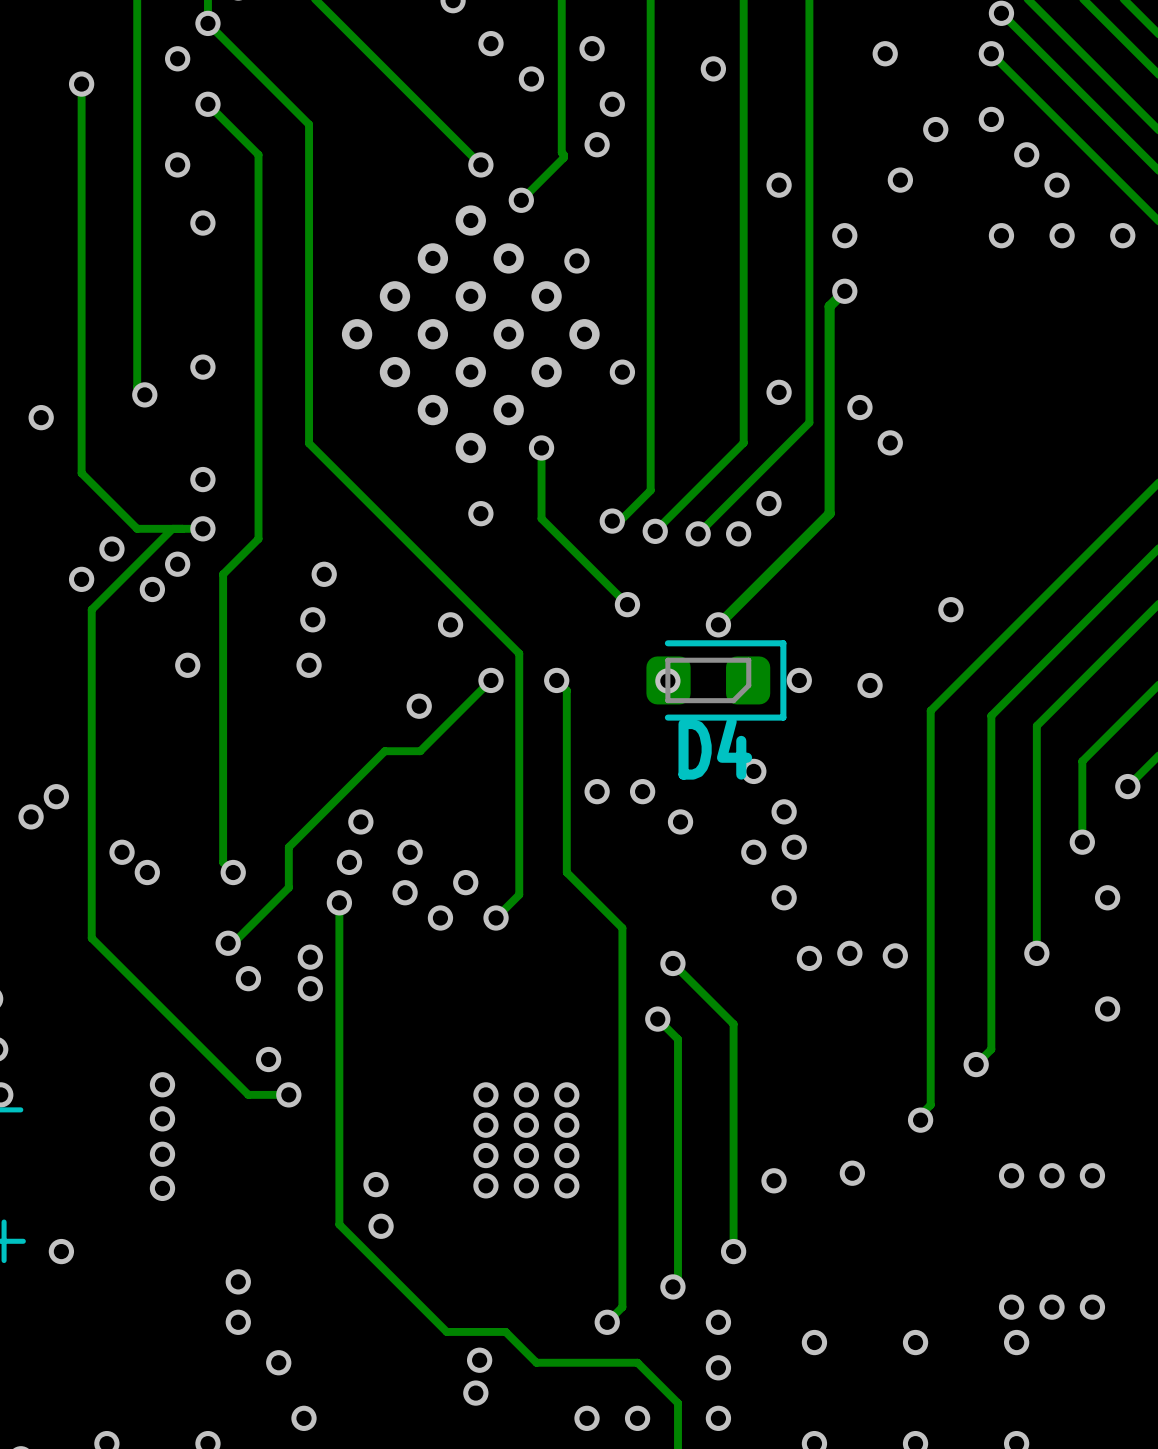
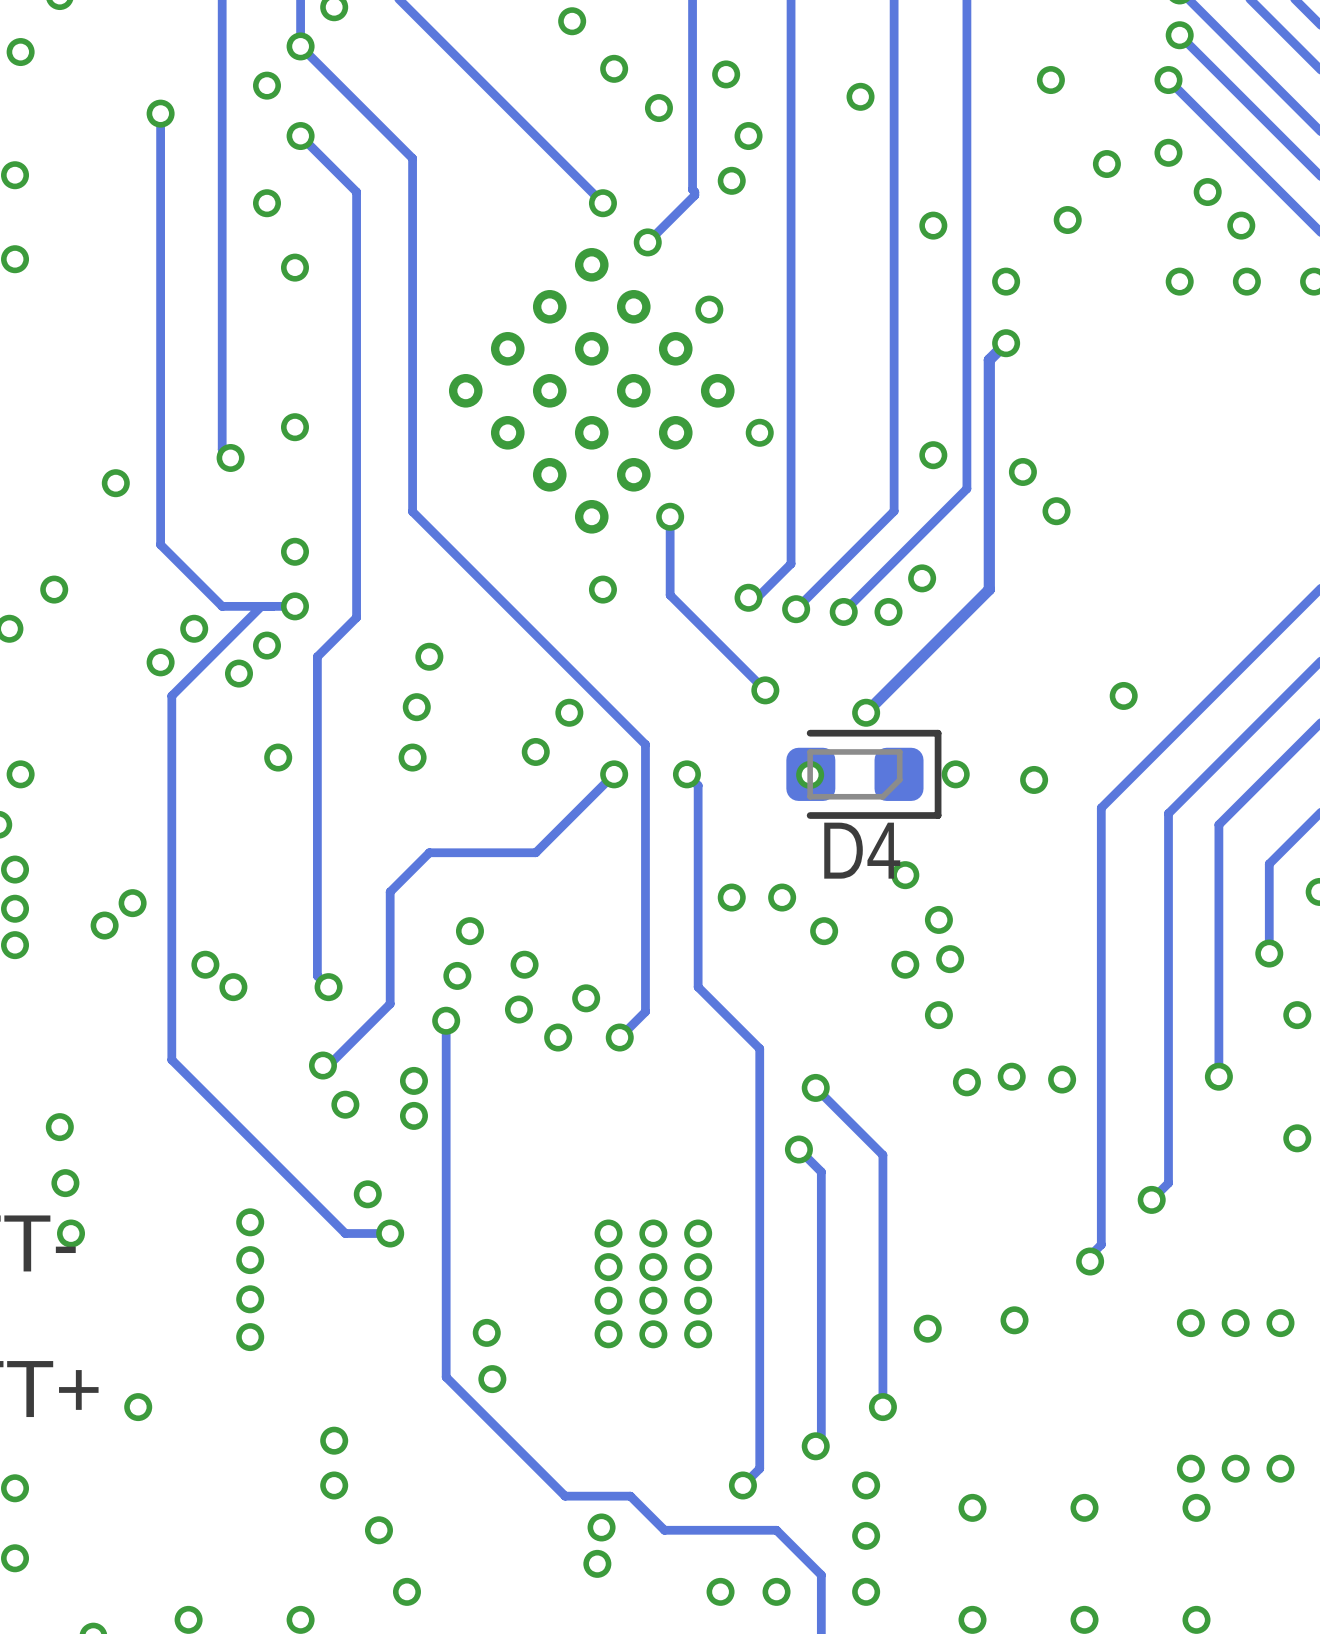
via position: (419, 706) -> (535, 751)
track: (384, 751) (288, 847) -> (496, 852) (429, 852) (390, 891) (390, 959)

